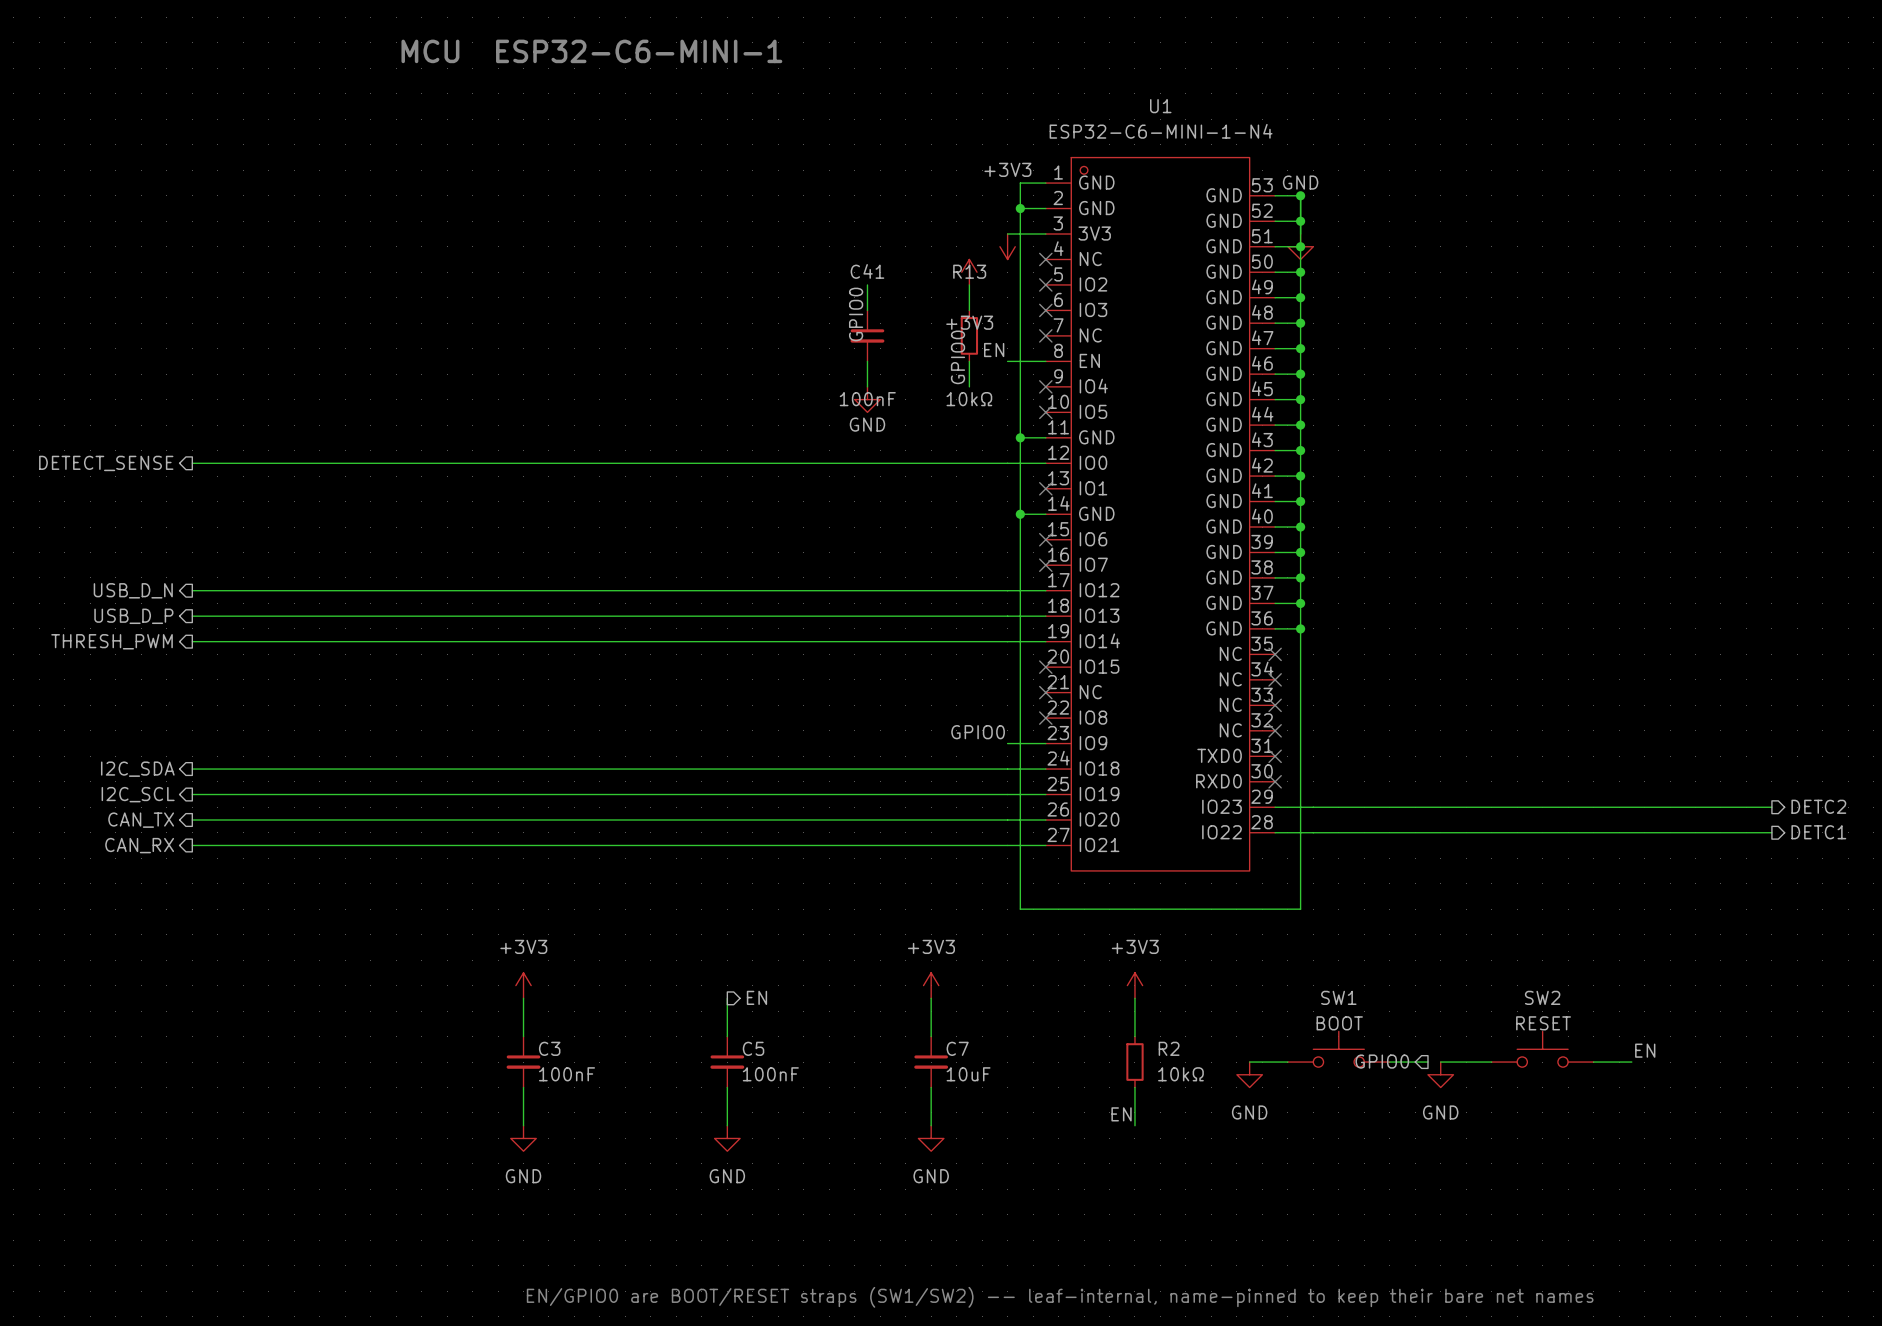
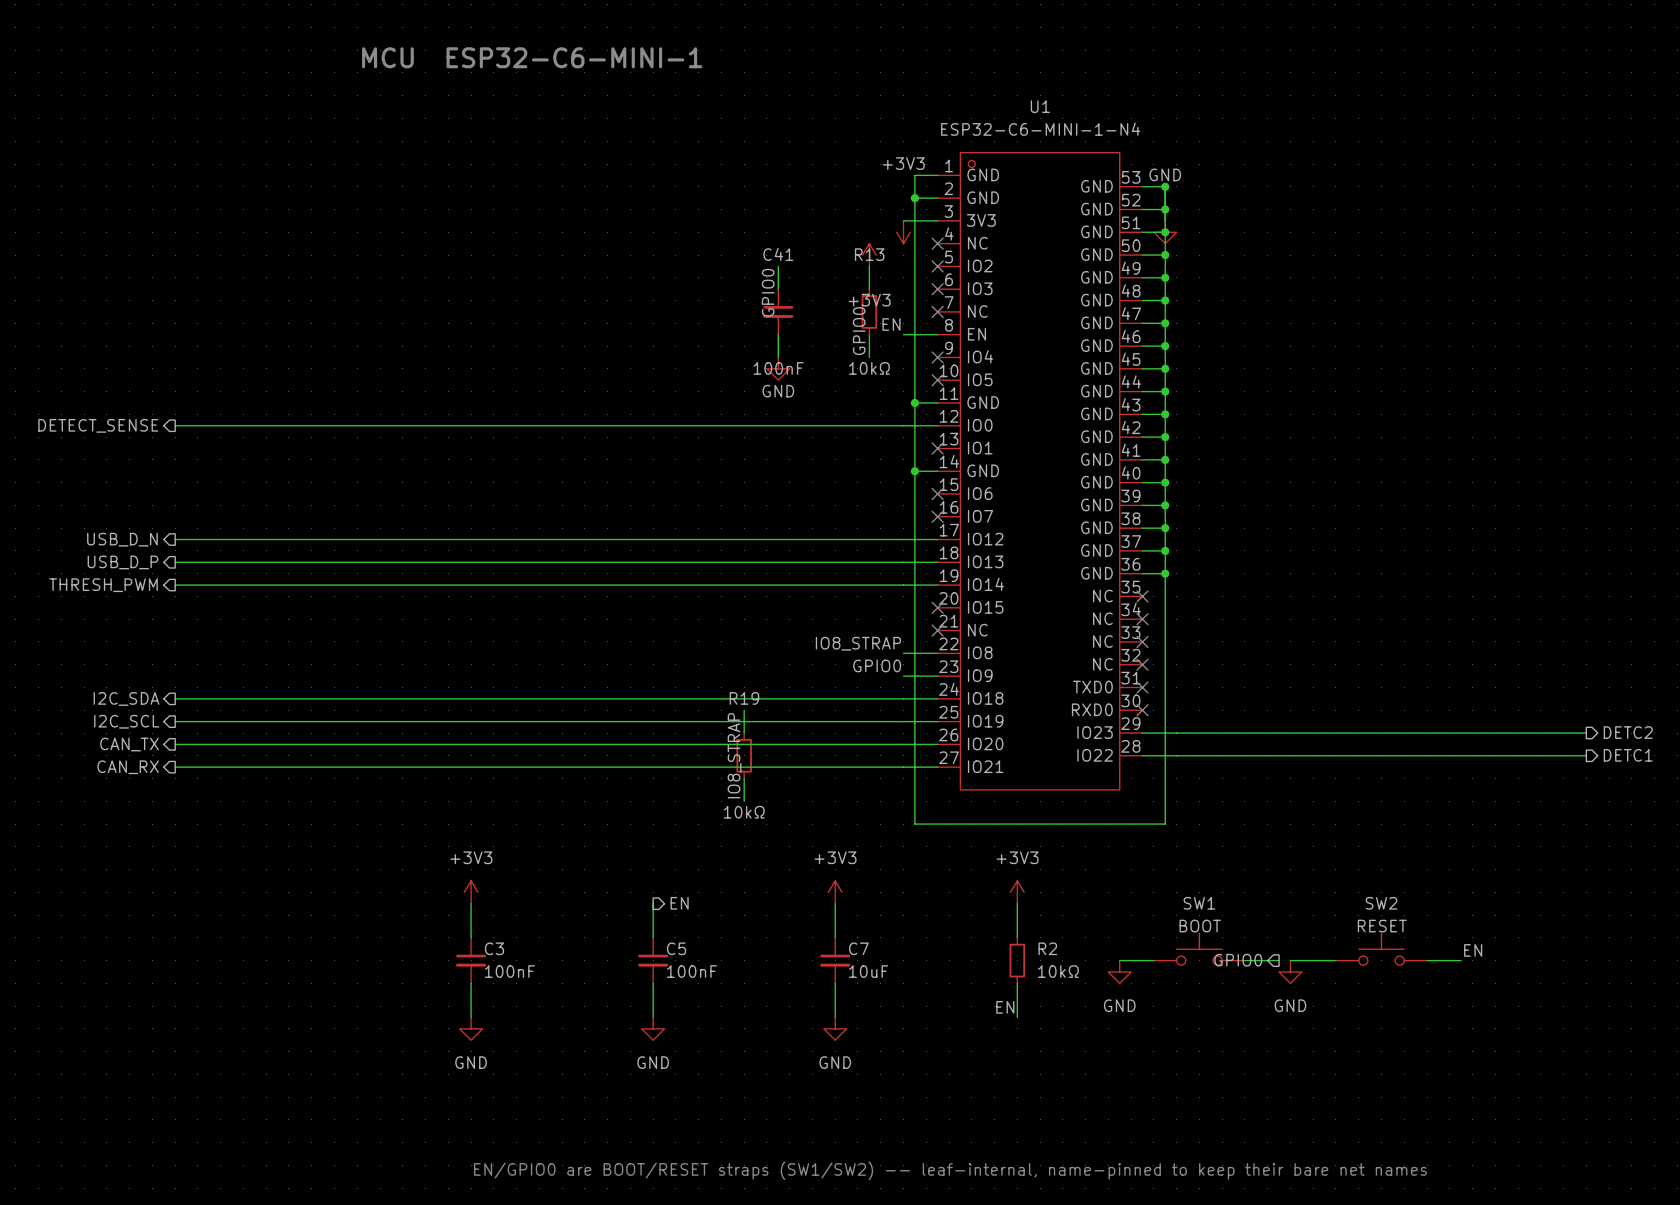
label: none -> IO8_STRAP (858, 643)
wire: none -> (903, 653) (937, 653)
no-connect mark: (1045, 718) -> none
wire: none -> (744, 710) (744, 733)
label: none -> IO8_STRAP (734, 755)
R19: none -> 10kΩ (744, 755)
wire: none -> (744, 778) (744, 801)

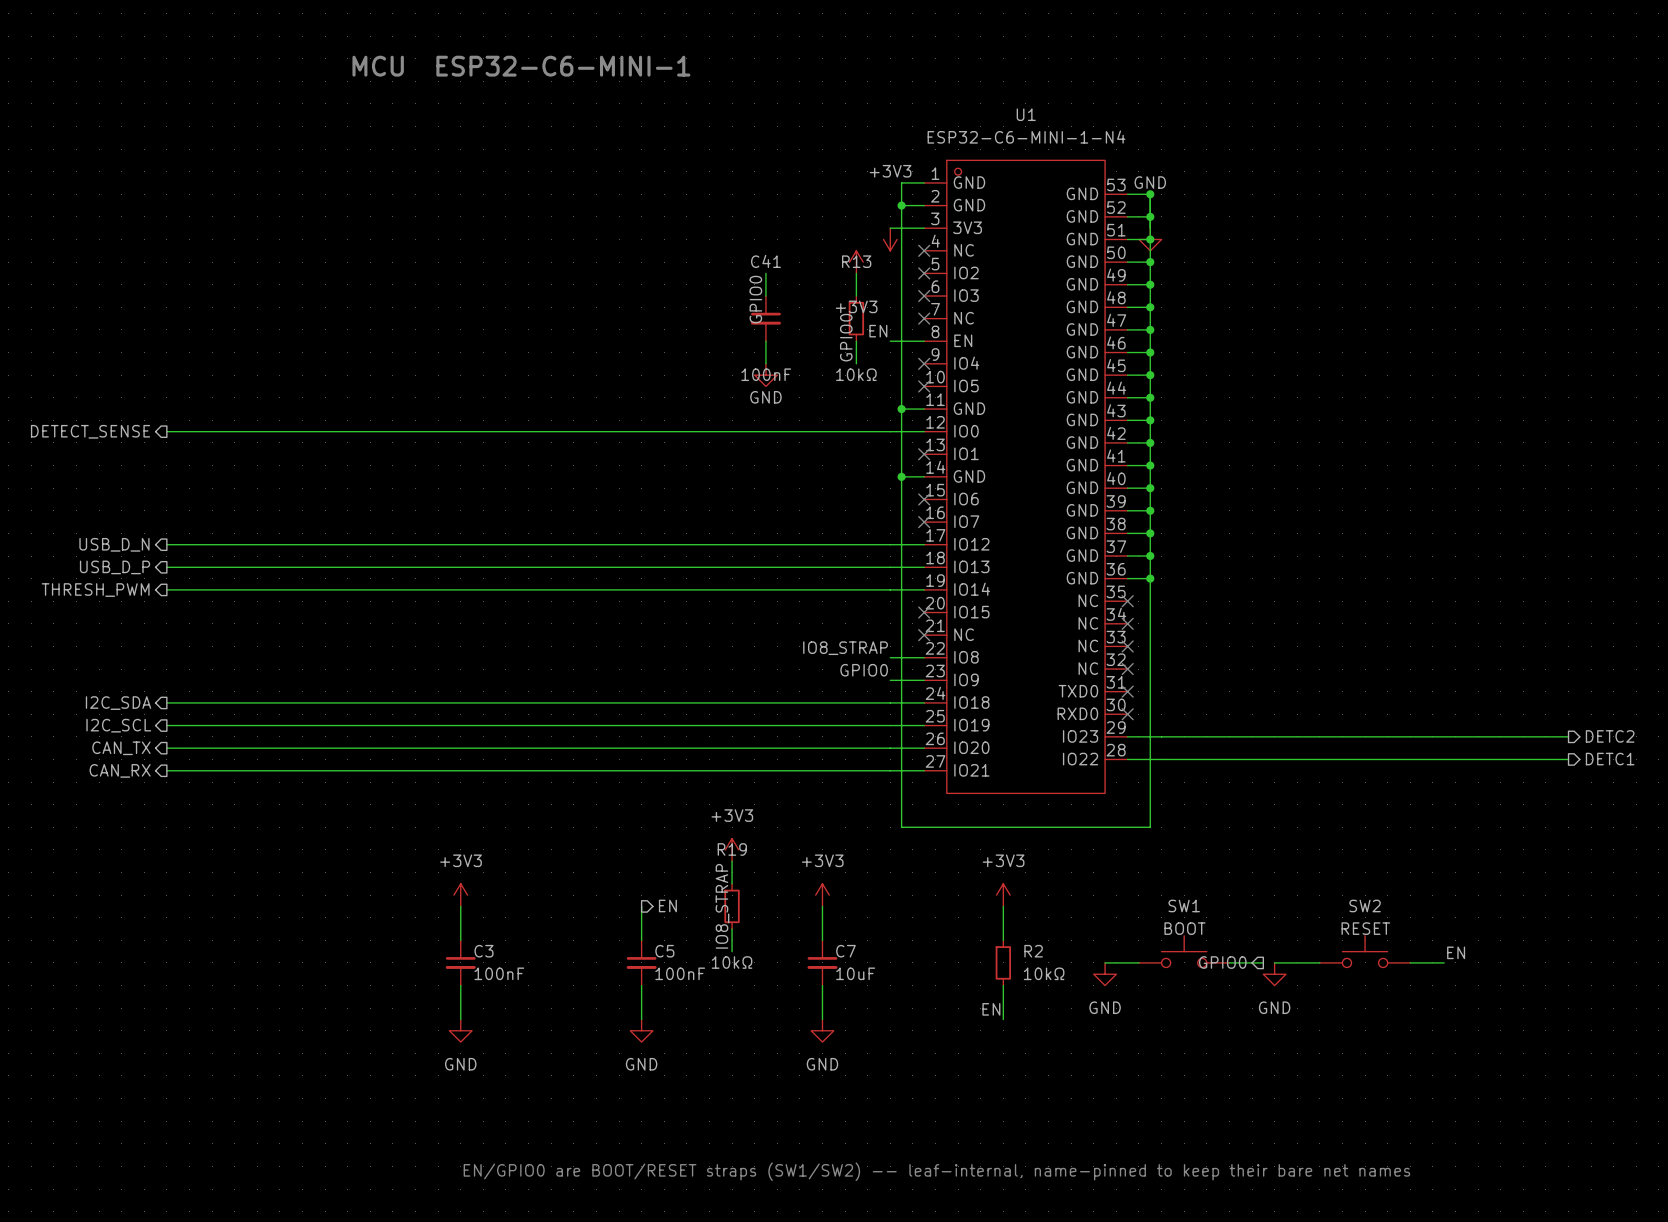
wire: (744, 710) (744, 733) -> (732, 861) (732, 883)
label position: IO8_STRAP (734, 755) -> IO8_STRAP (722, 906)
R19 position: (744, 755) -> (732, 906)
wire: (744, 778) (744, 801) -> (732, 929) (732, 951)
power symbol: none -> +3V3 (732, 849)

